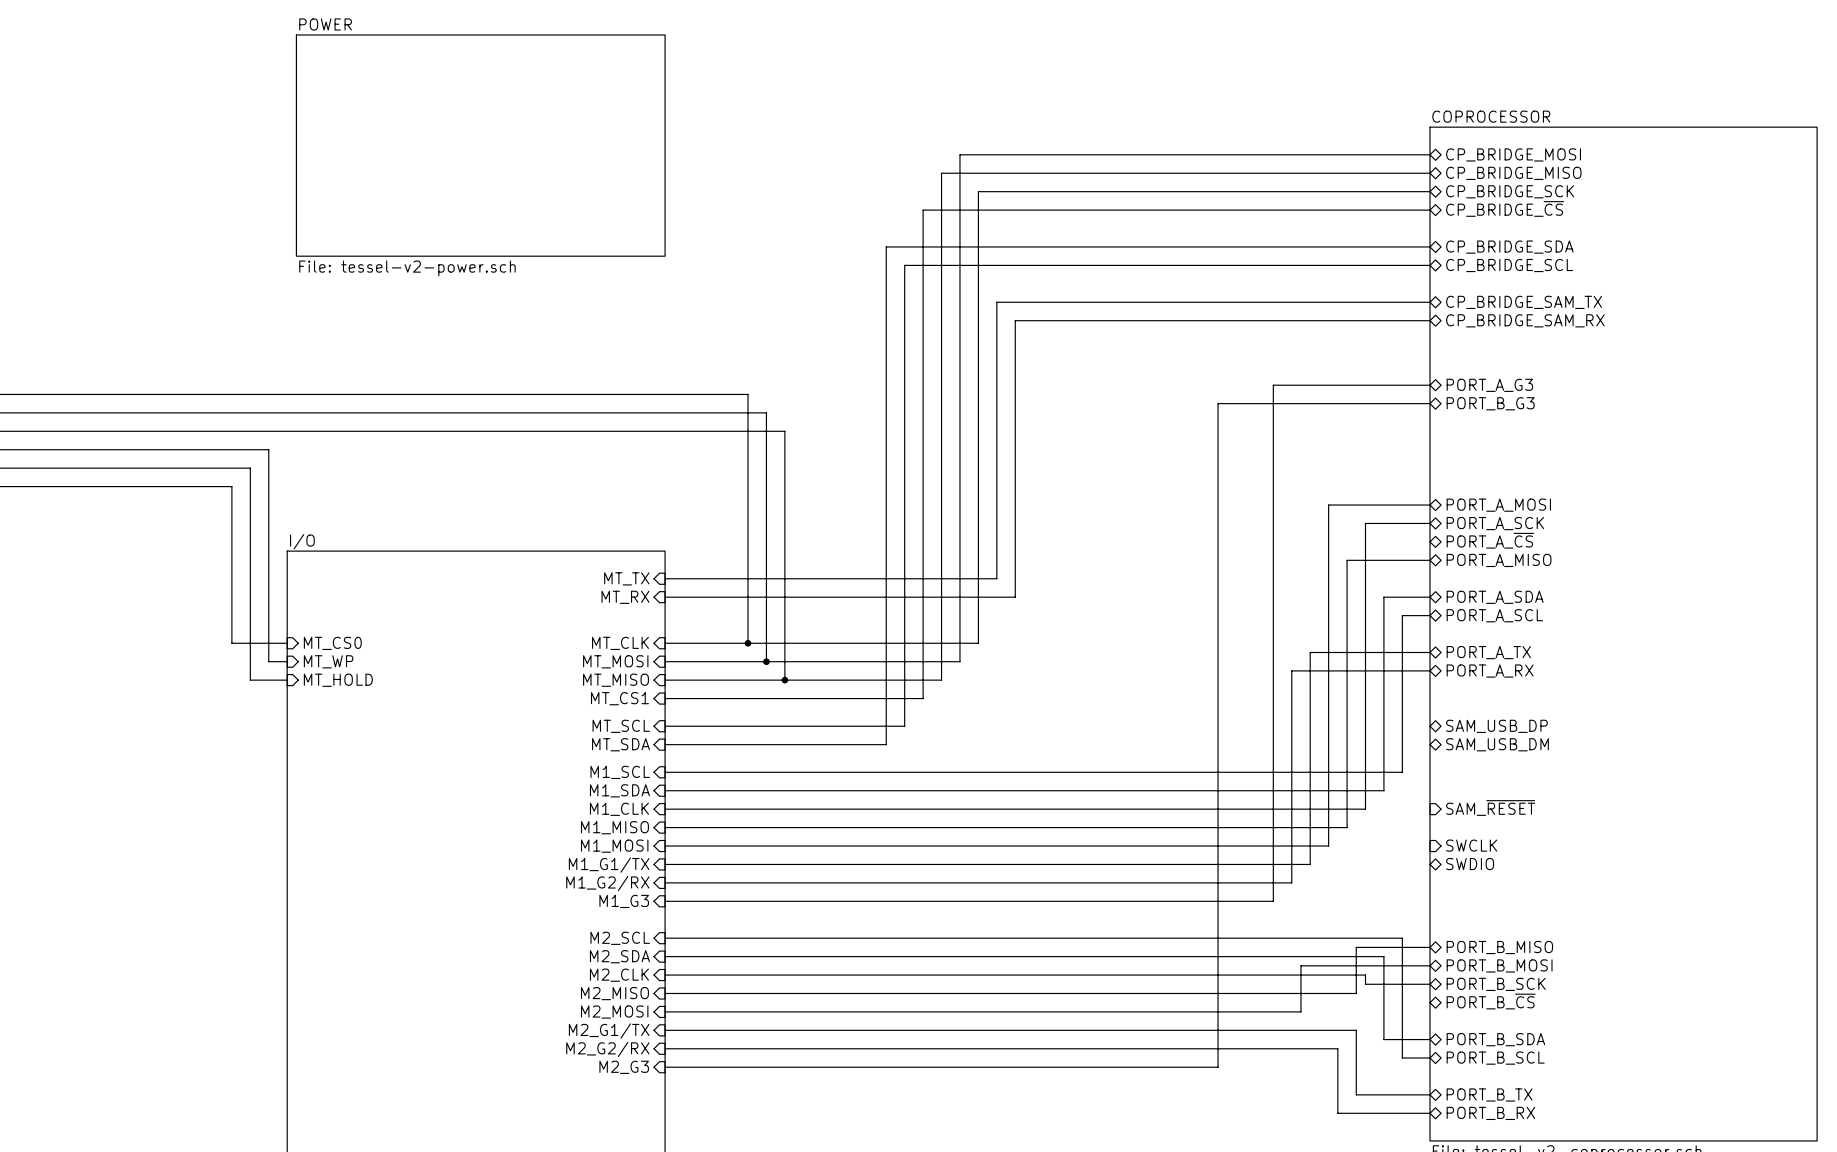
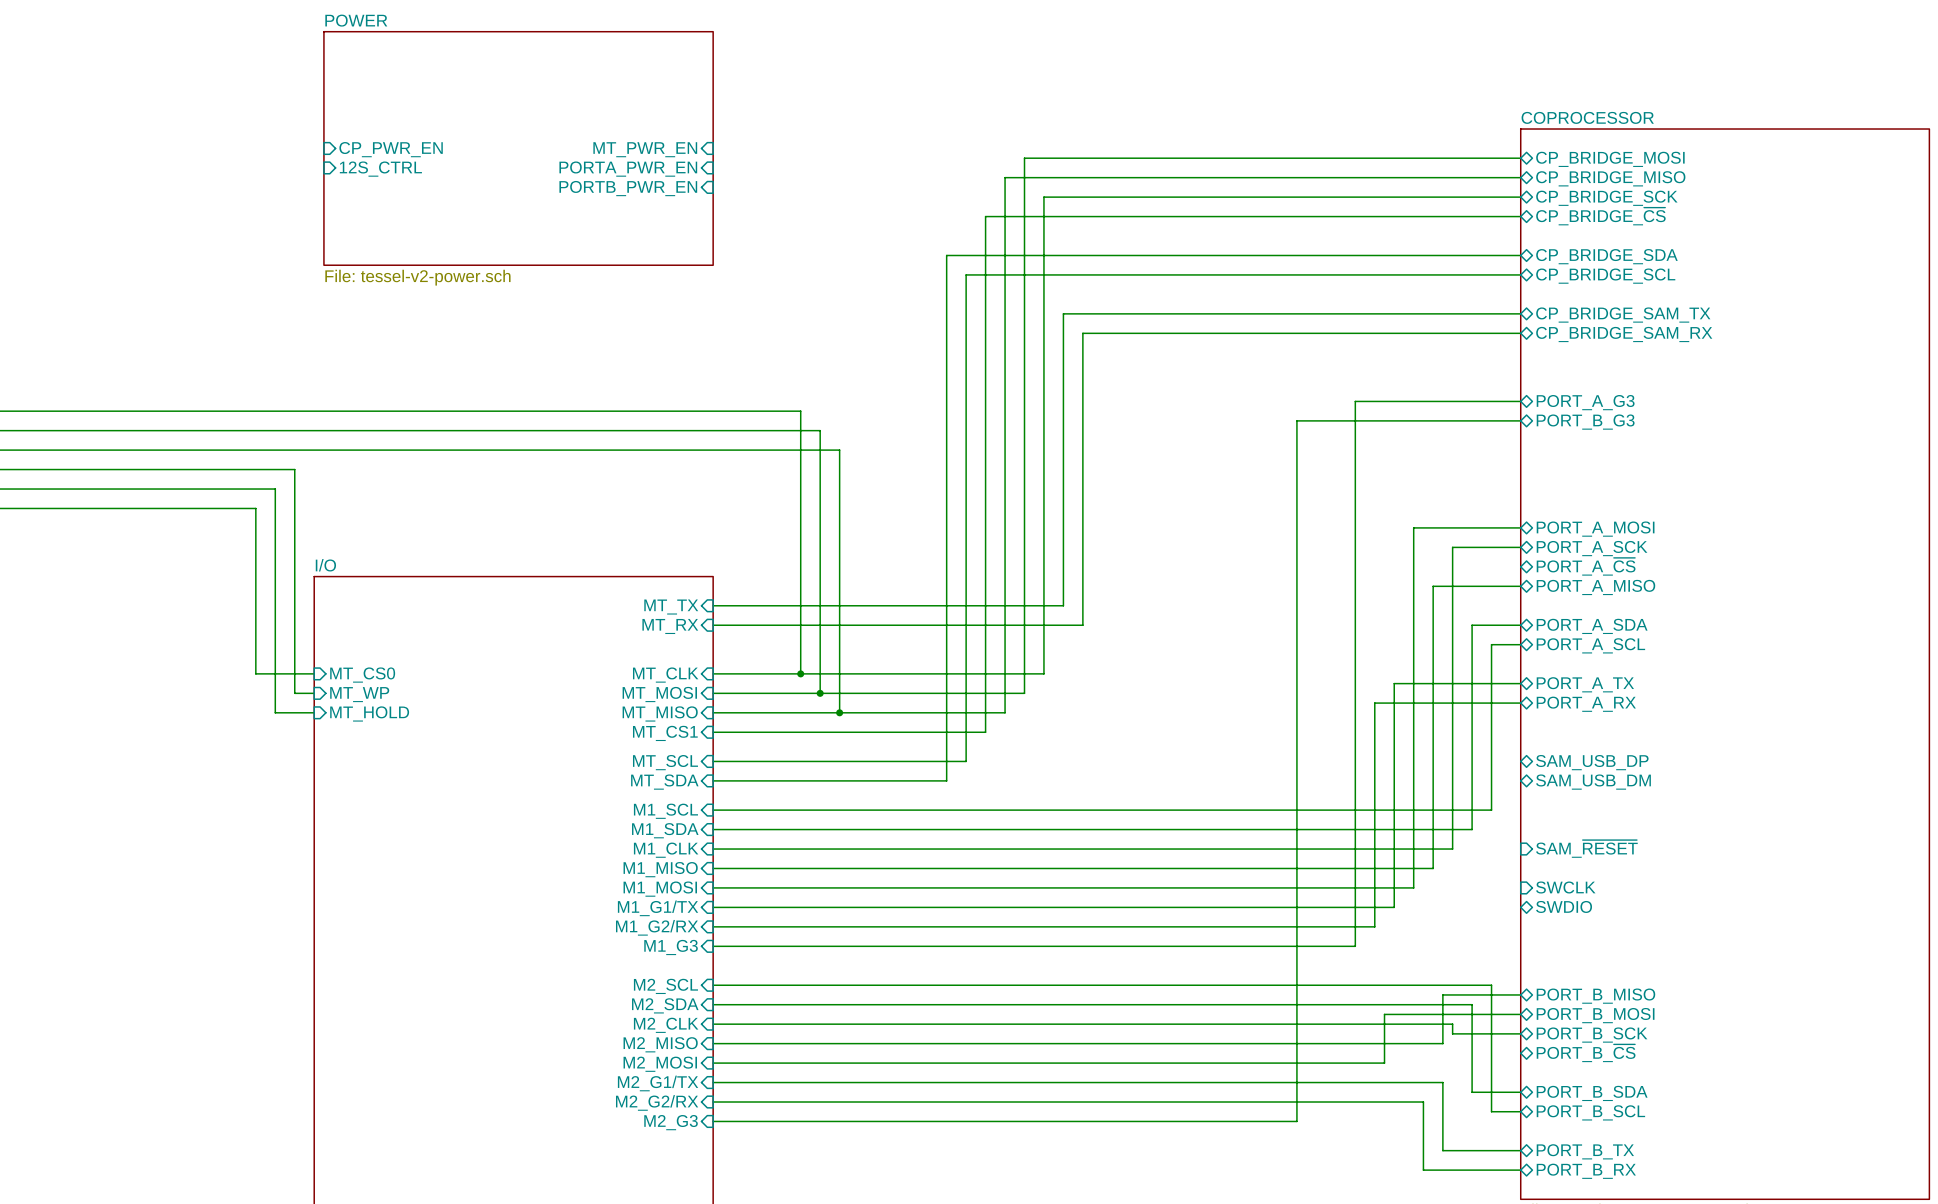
sheet pin: none -> CP_PWR_EN (391, 149)
sheet pin: none -> MT_PWR_EN (645, 149)
sheet pin: none -> 12S_CTRL (380, 169)
sheet pin: none -> PORTA_PWR_EN (628, 169)
sheet pin: none -> PORTB_PWR_EN (628, 188)

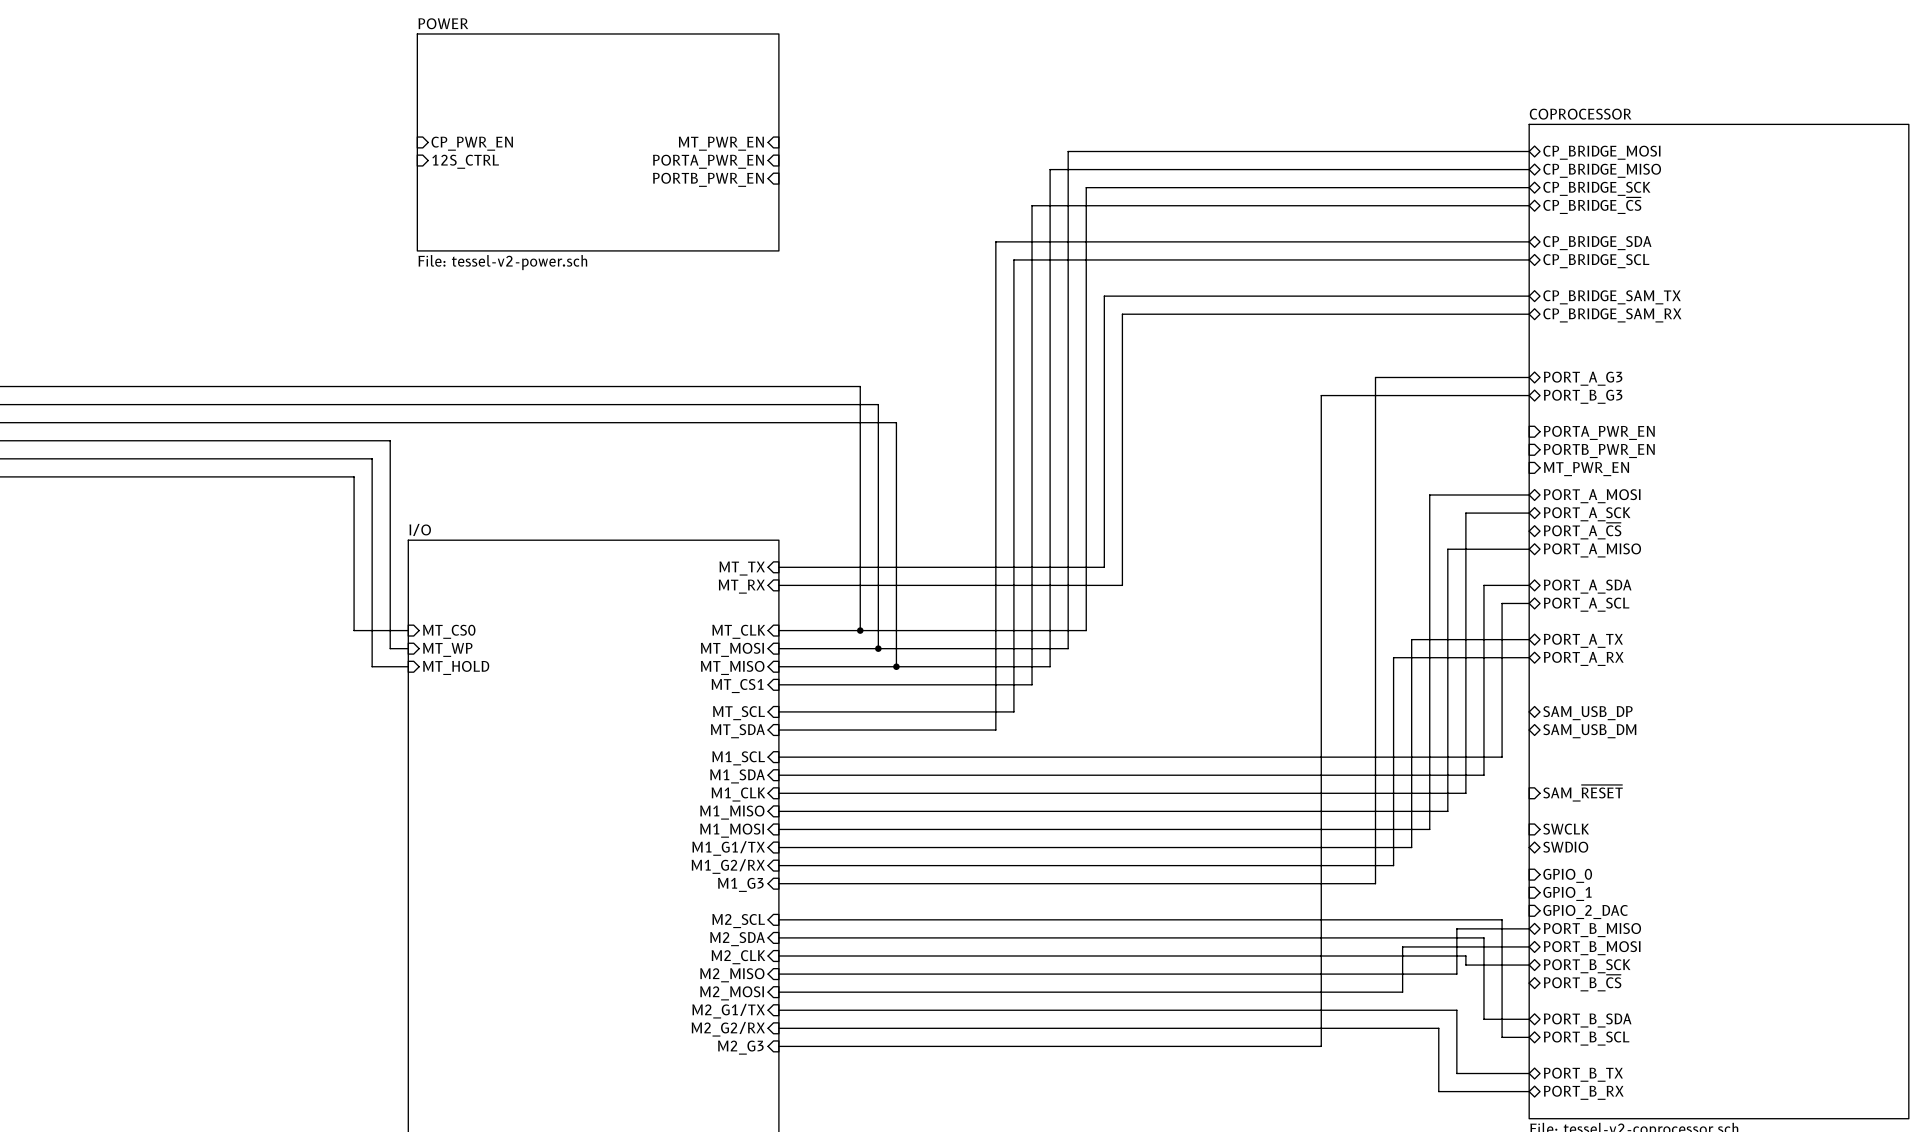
sheet pin: none -> PORTA_PWR_EN (1599, 432)
sheet pin: none -> PORTB_PWR_EN (1599, 451)
sheet pin: none -> MT_PWR_EN (1586, 469)
sheet pin: none -> GPIO_0 (1567, 875)
sheet pin: none -> GPIO_1 (1567, 893)
sheet pin: none -> GPIO_2_DAC (1585, 912)

